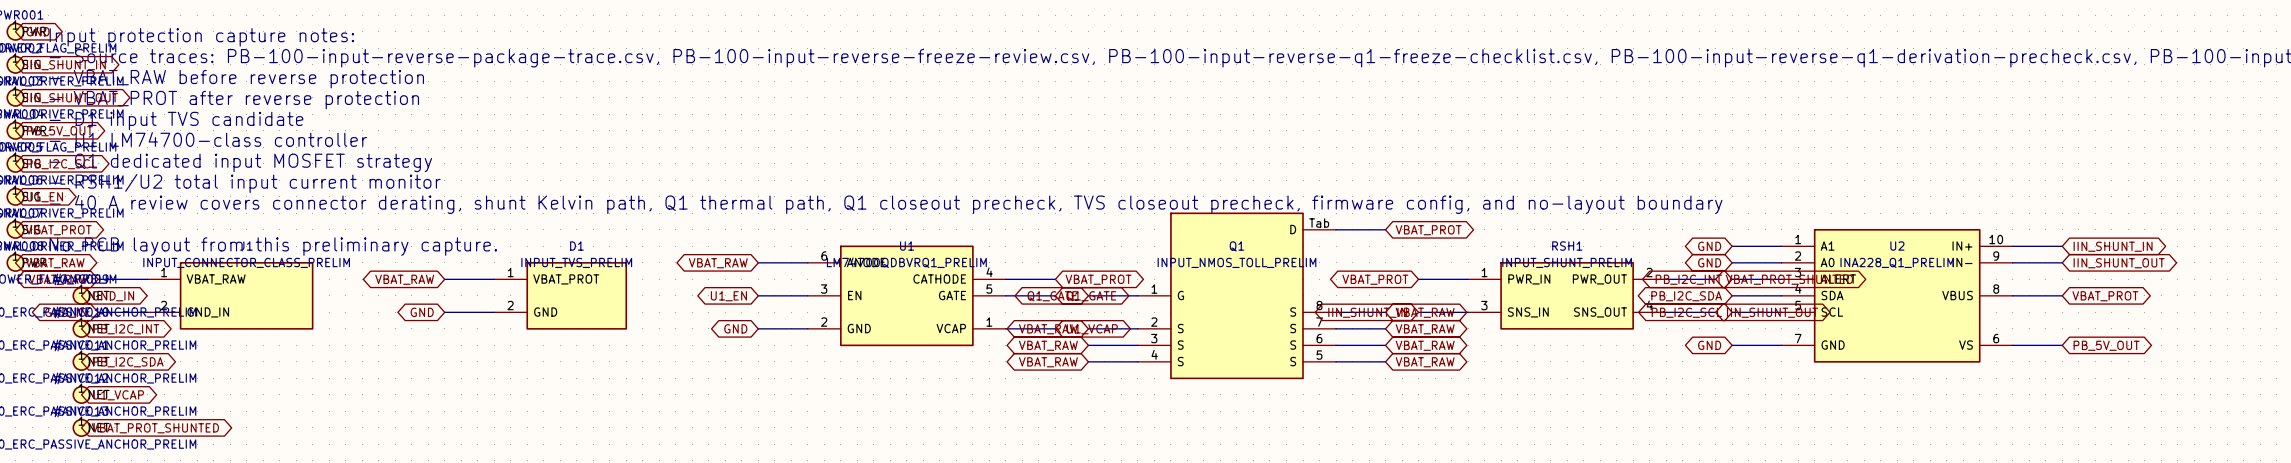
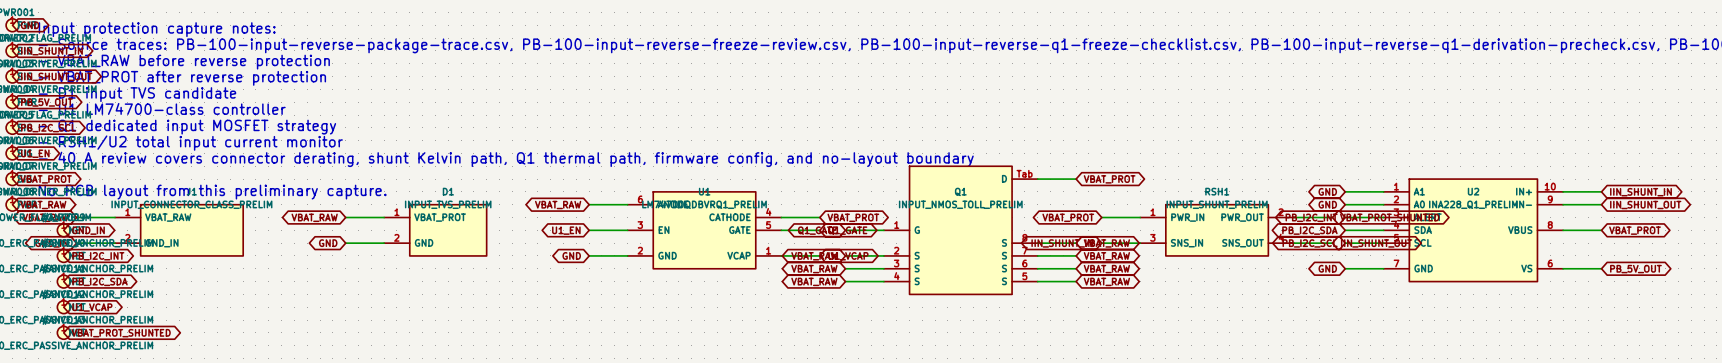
text: - 40 A review covers connector derating, shunt Kelvin path, Q1 thermal path, Q1 closeout precheck, TVS closeout precheck, firmware config, and no-layout boundary (886, 204) -> - 40 A review covers connector derating, shunt Kelvin path, Q1 thermal path, firmware config, and no-layout boundary (506, 159)

